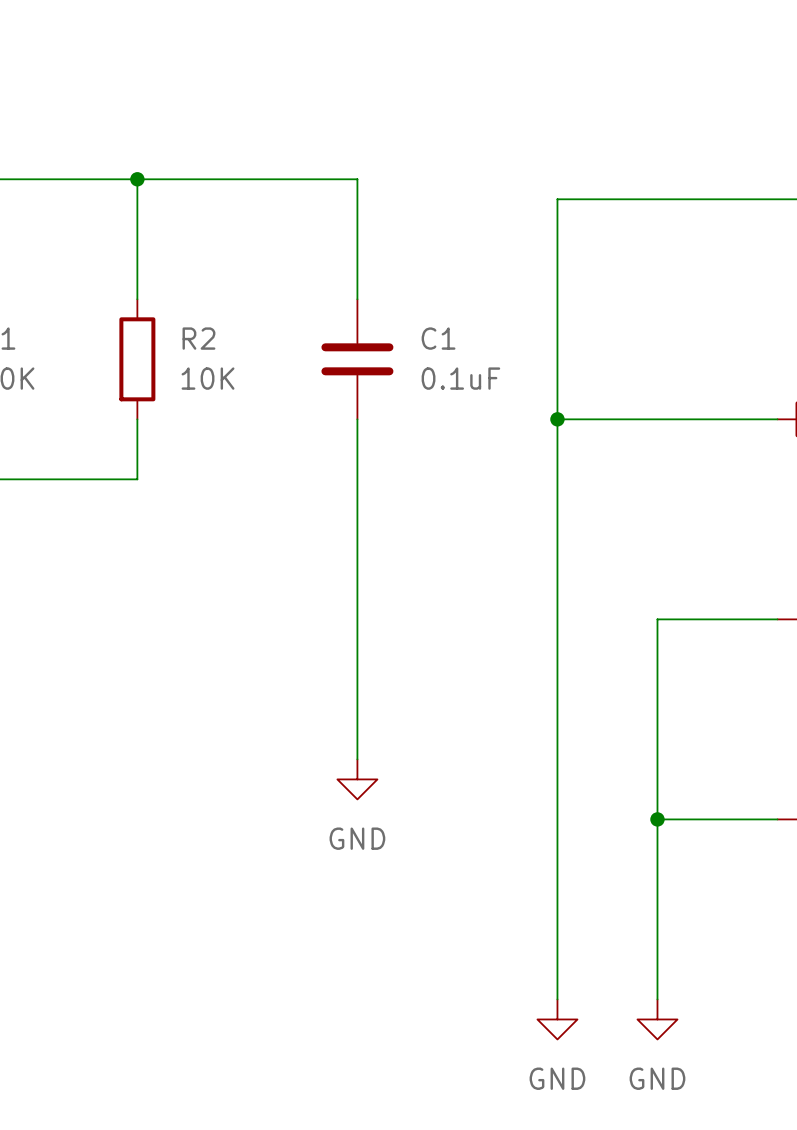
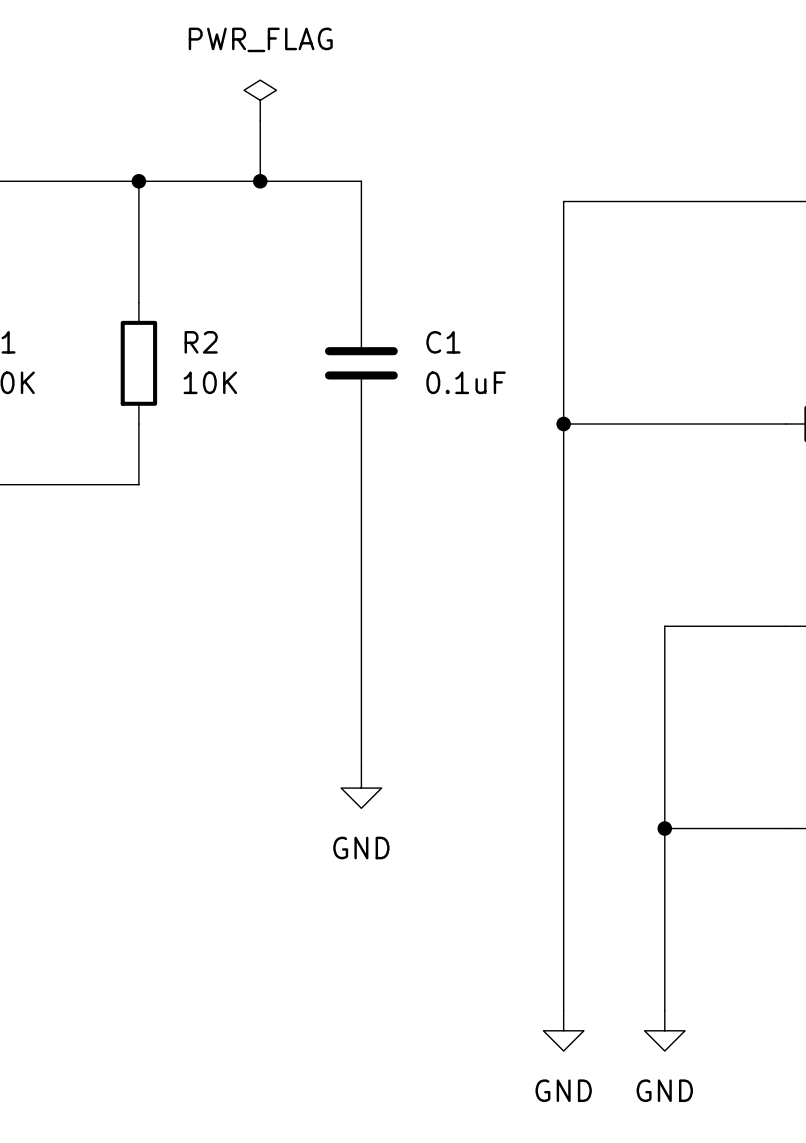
power symbol: none -> PWR_FLAG (260, 100)
wire: none -> (260, 120) (260, 181)
junction: none -> (260, 181)

